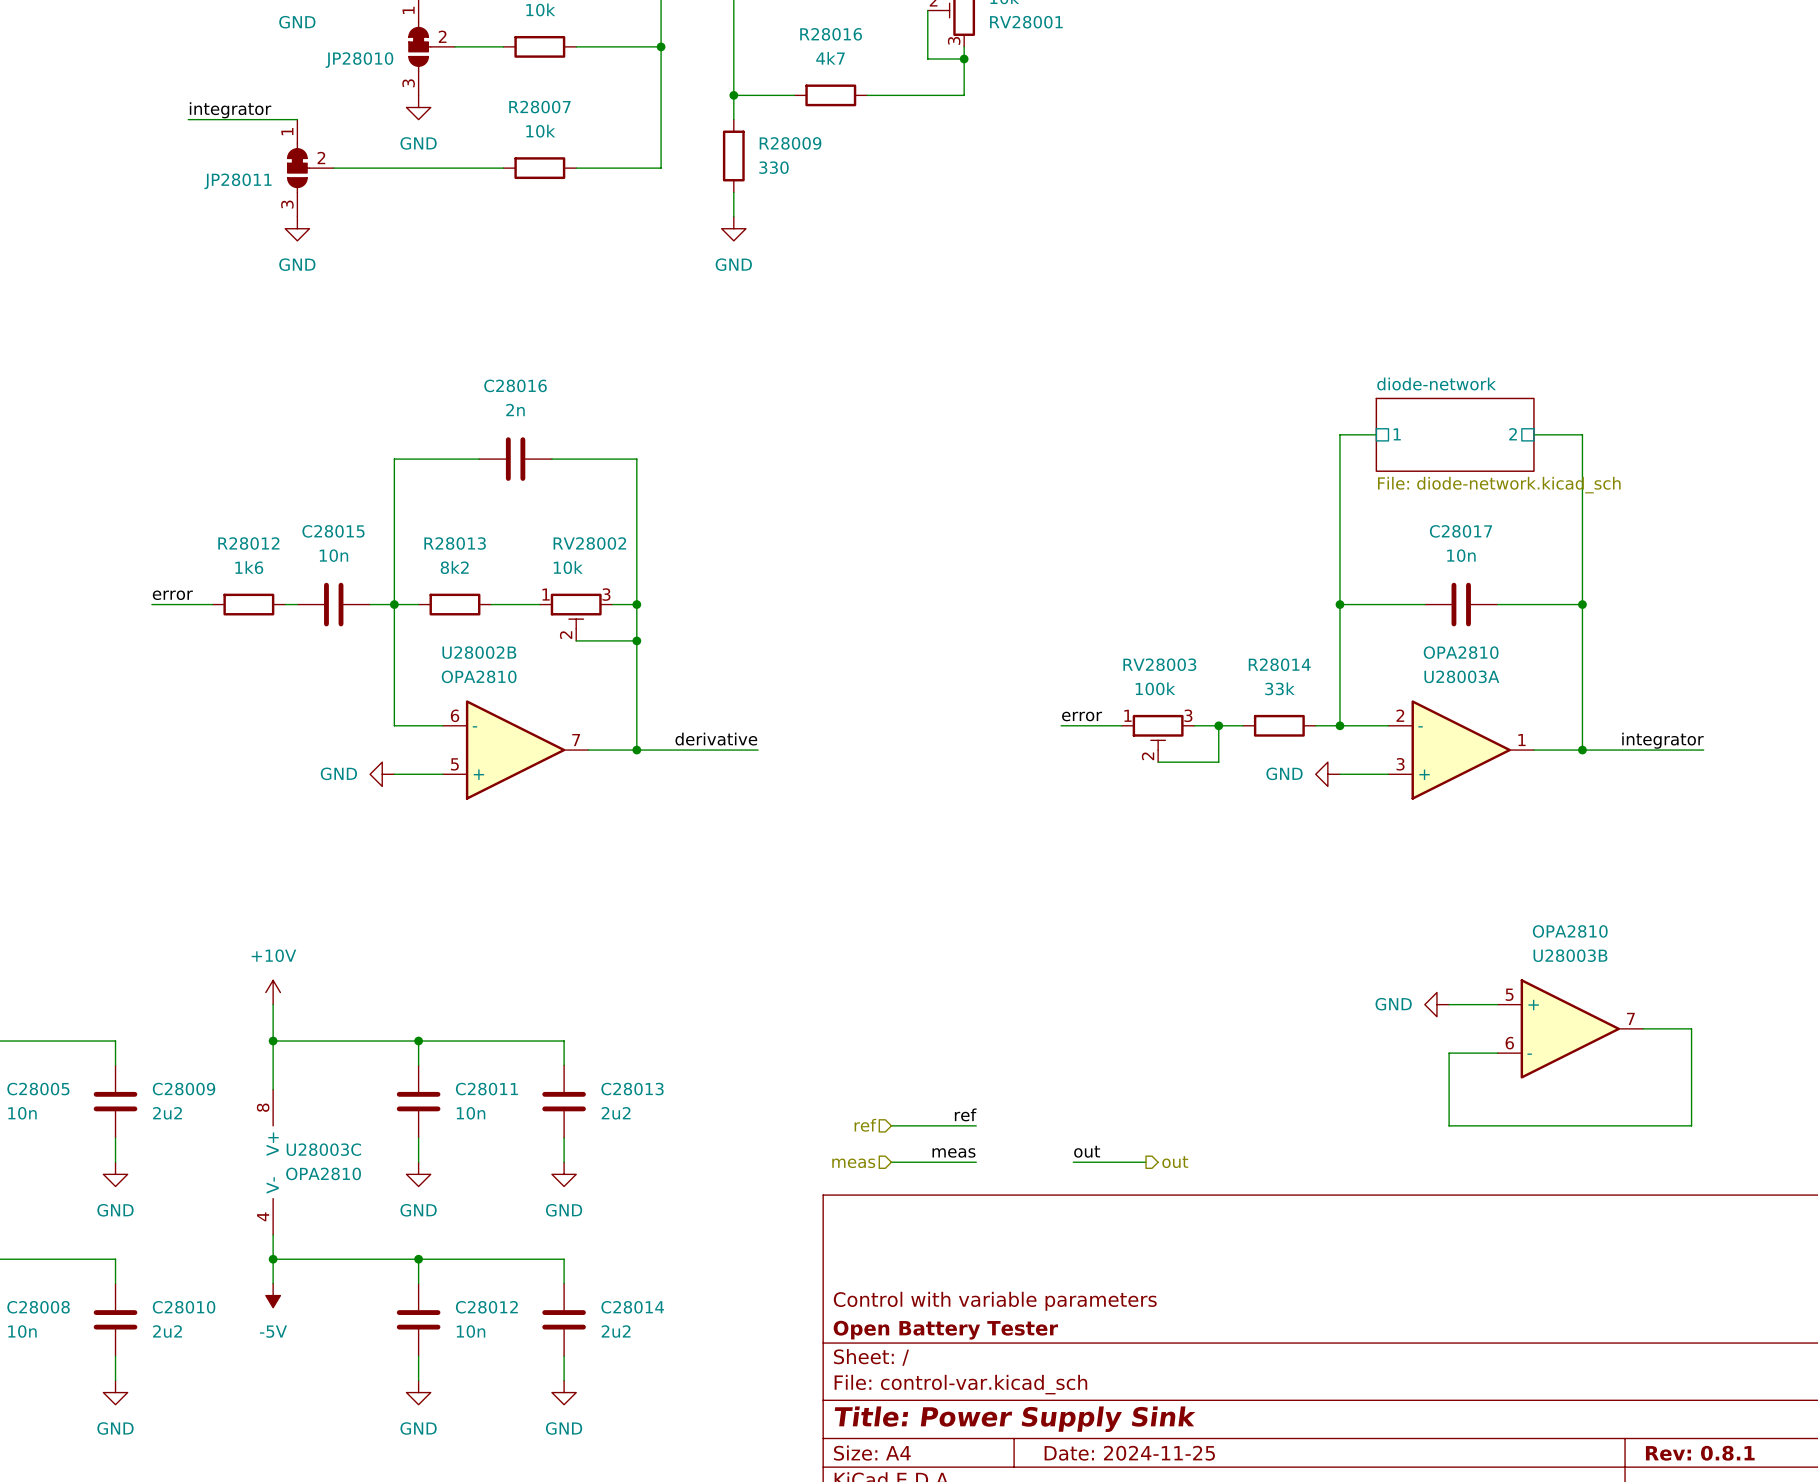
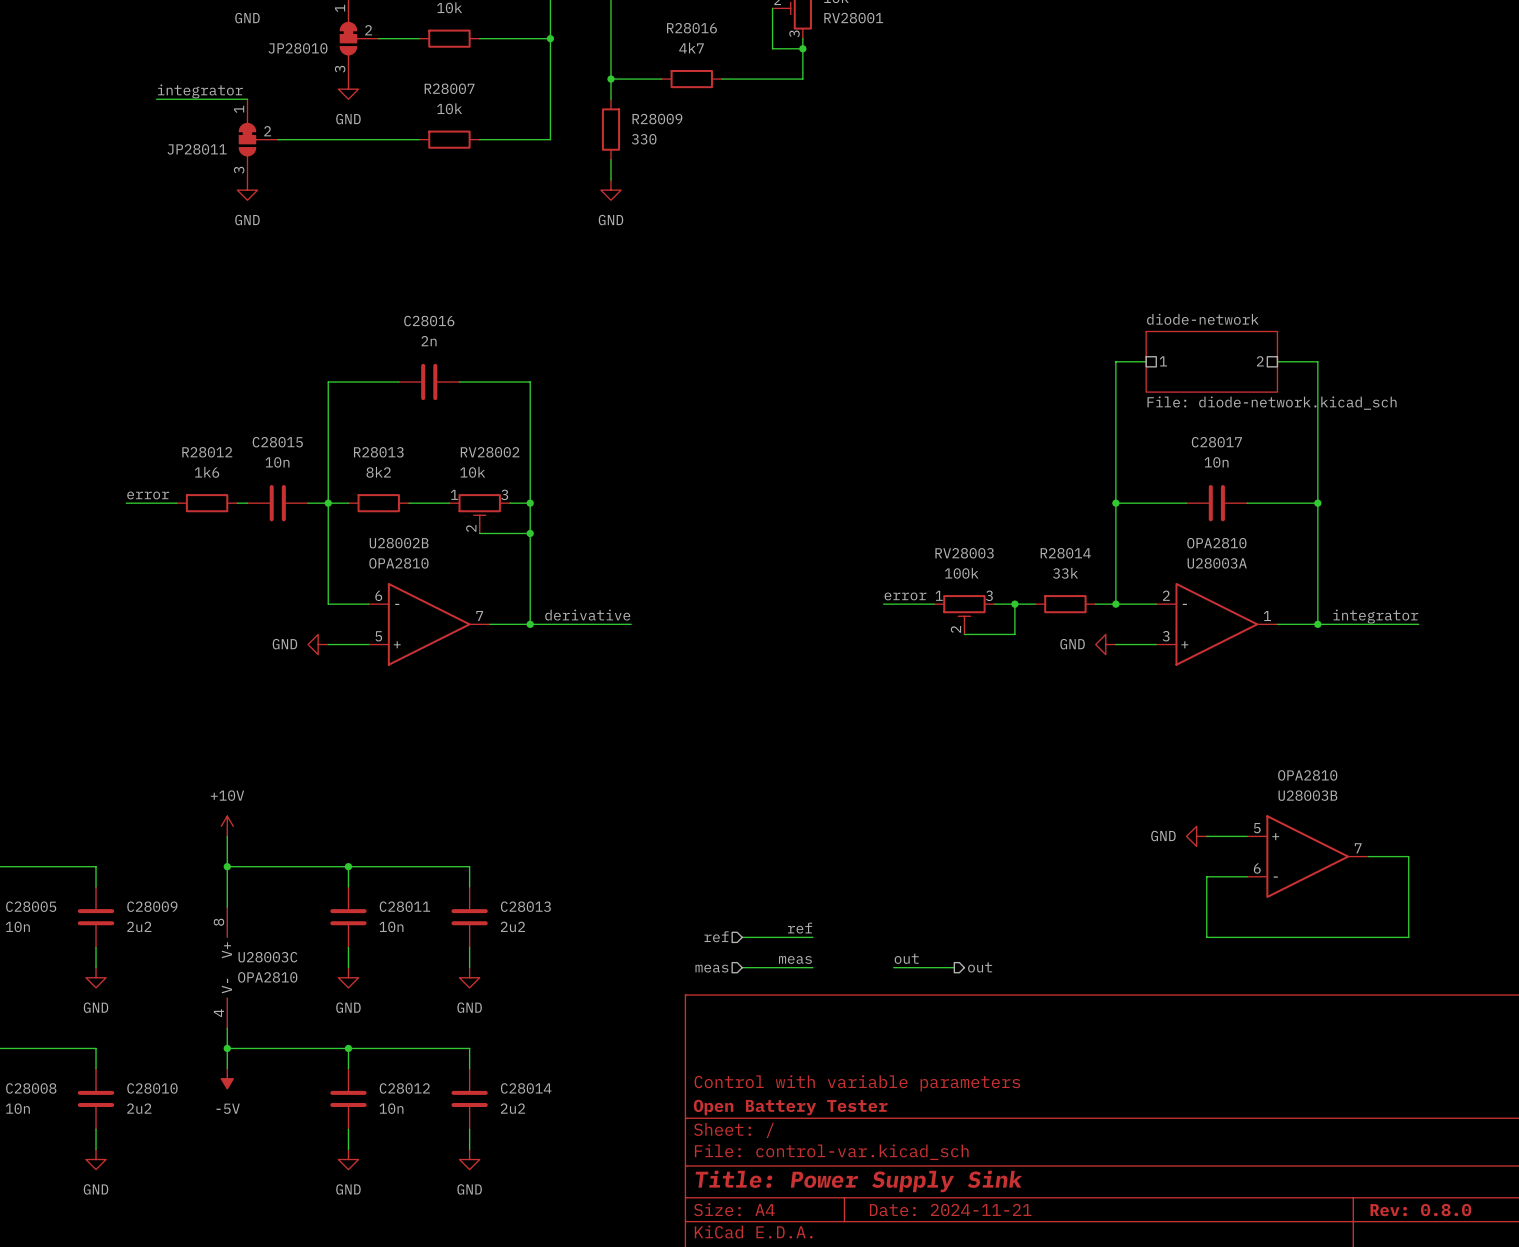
title block: Date: 2024-11-25 (1129, 1453) -> Date: 2024-11-21 (950, 1210)
title block: Rev: 0.8.1 (1700, 1453) -> Rev: 0.8.0 (1420, 1210)

